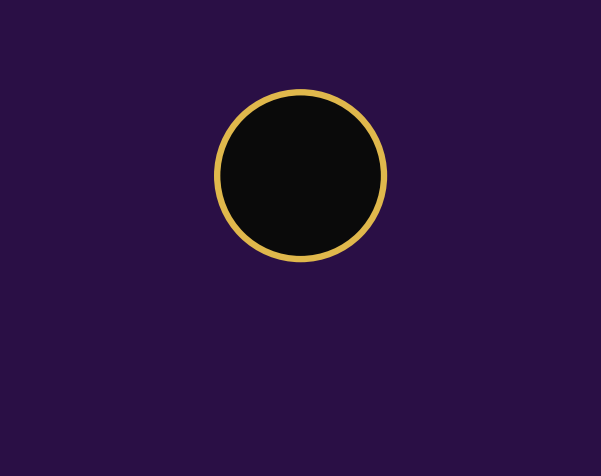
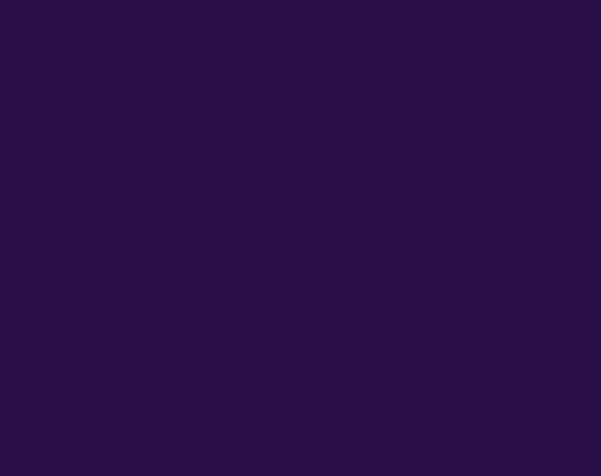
part: (300, 175) -> none

